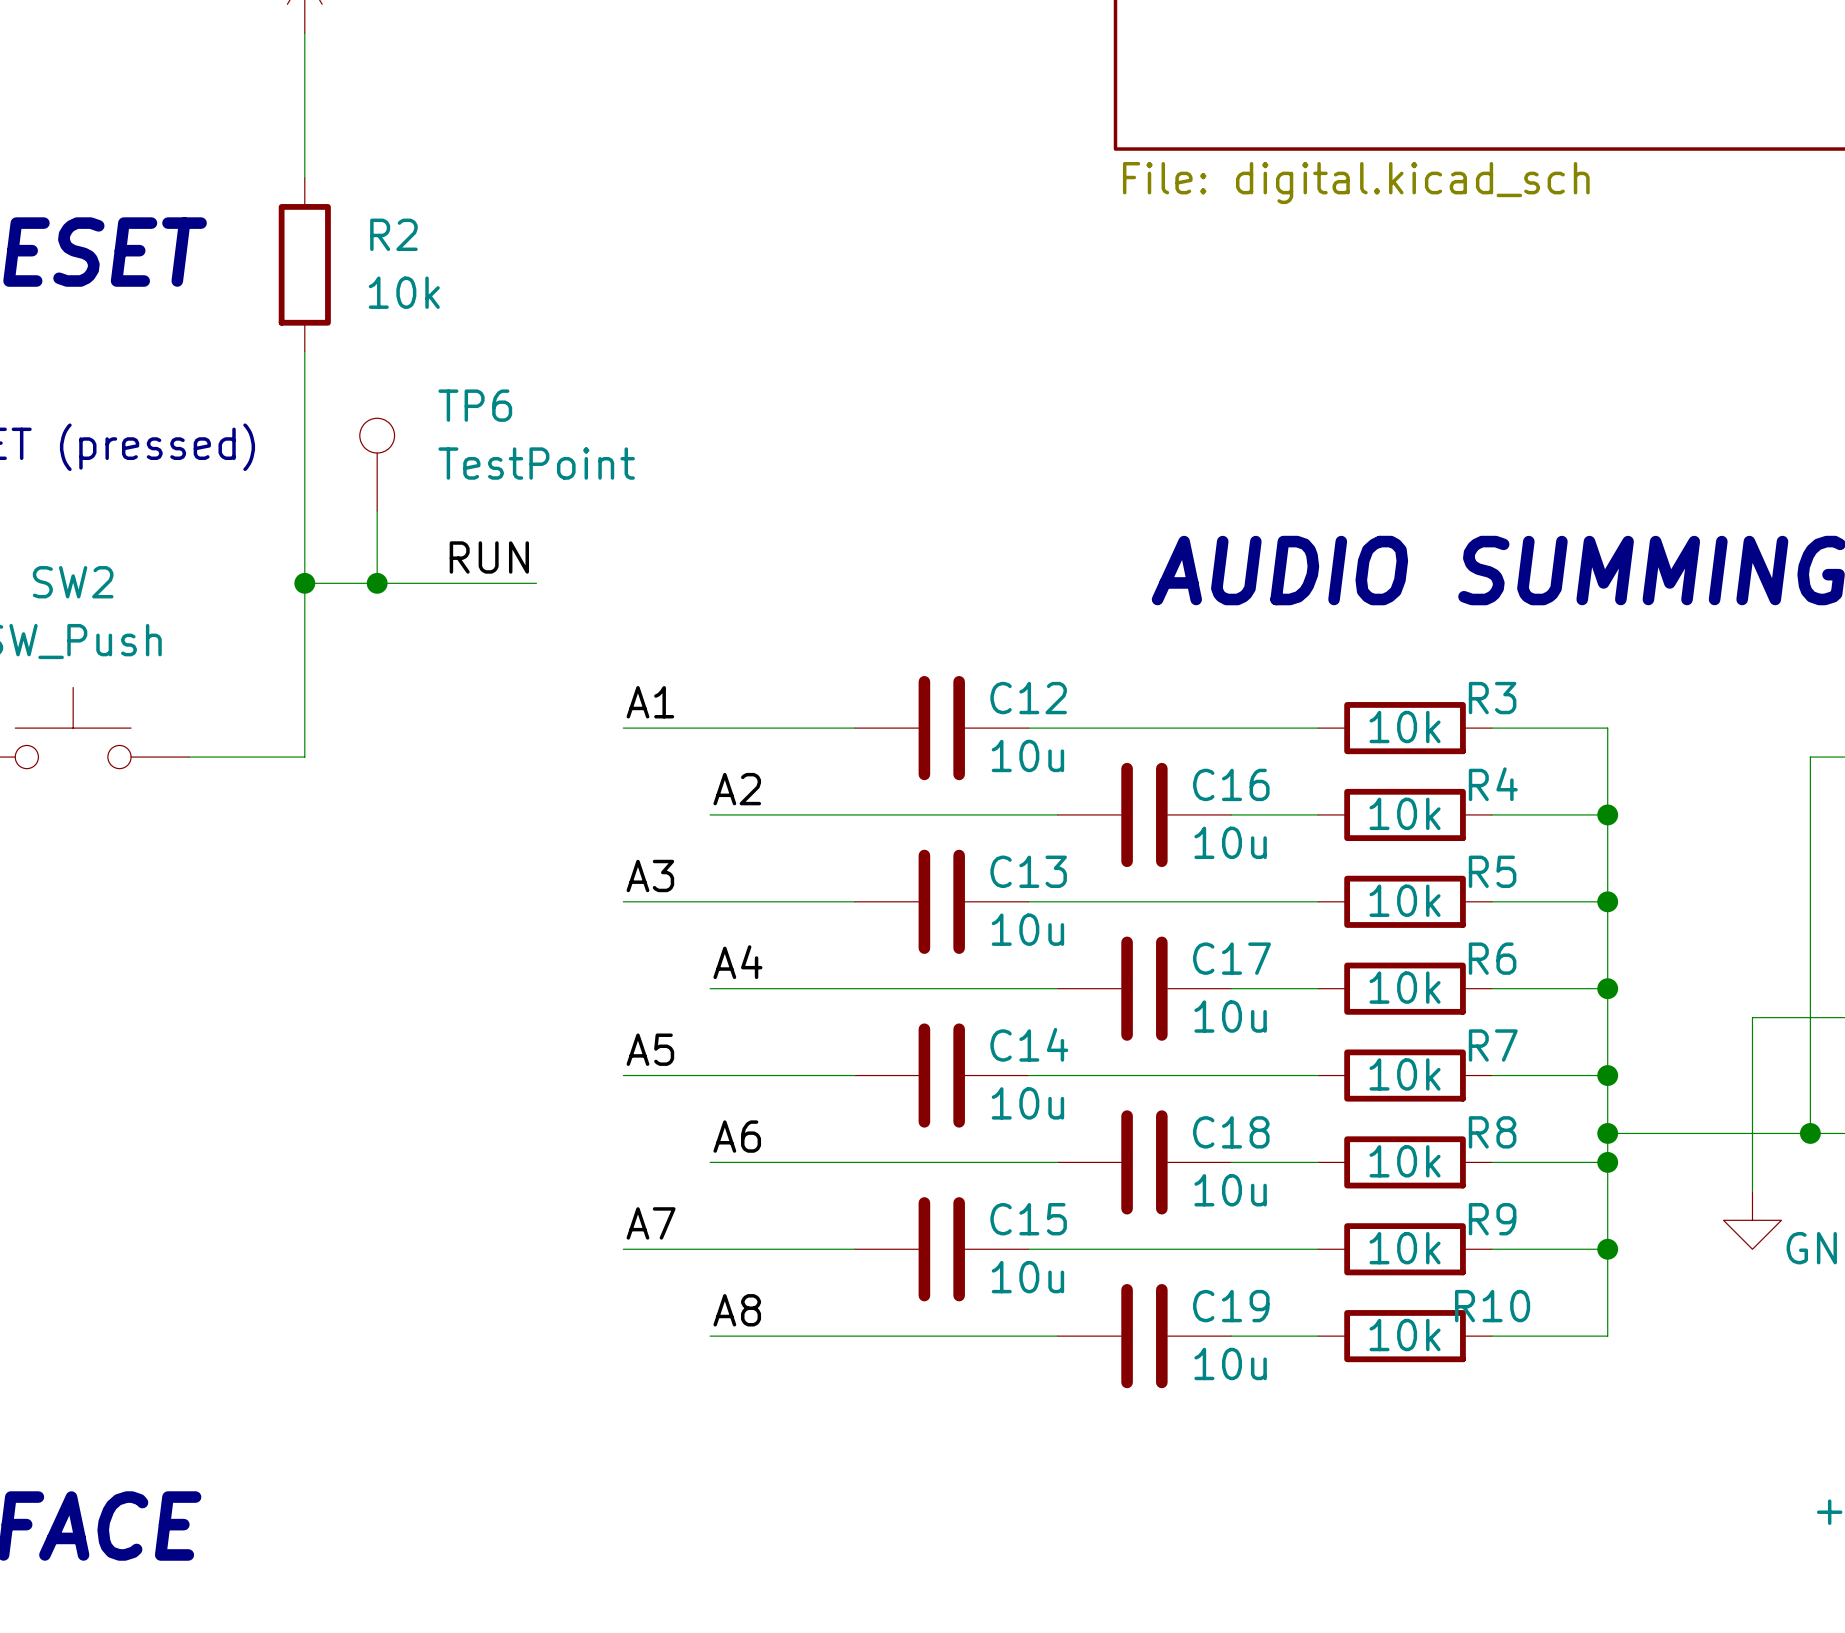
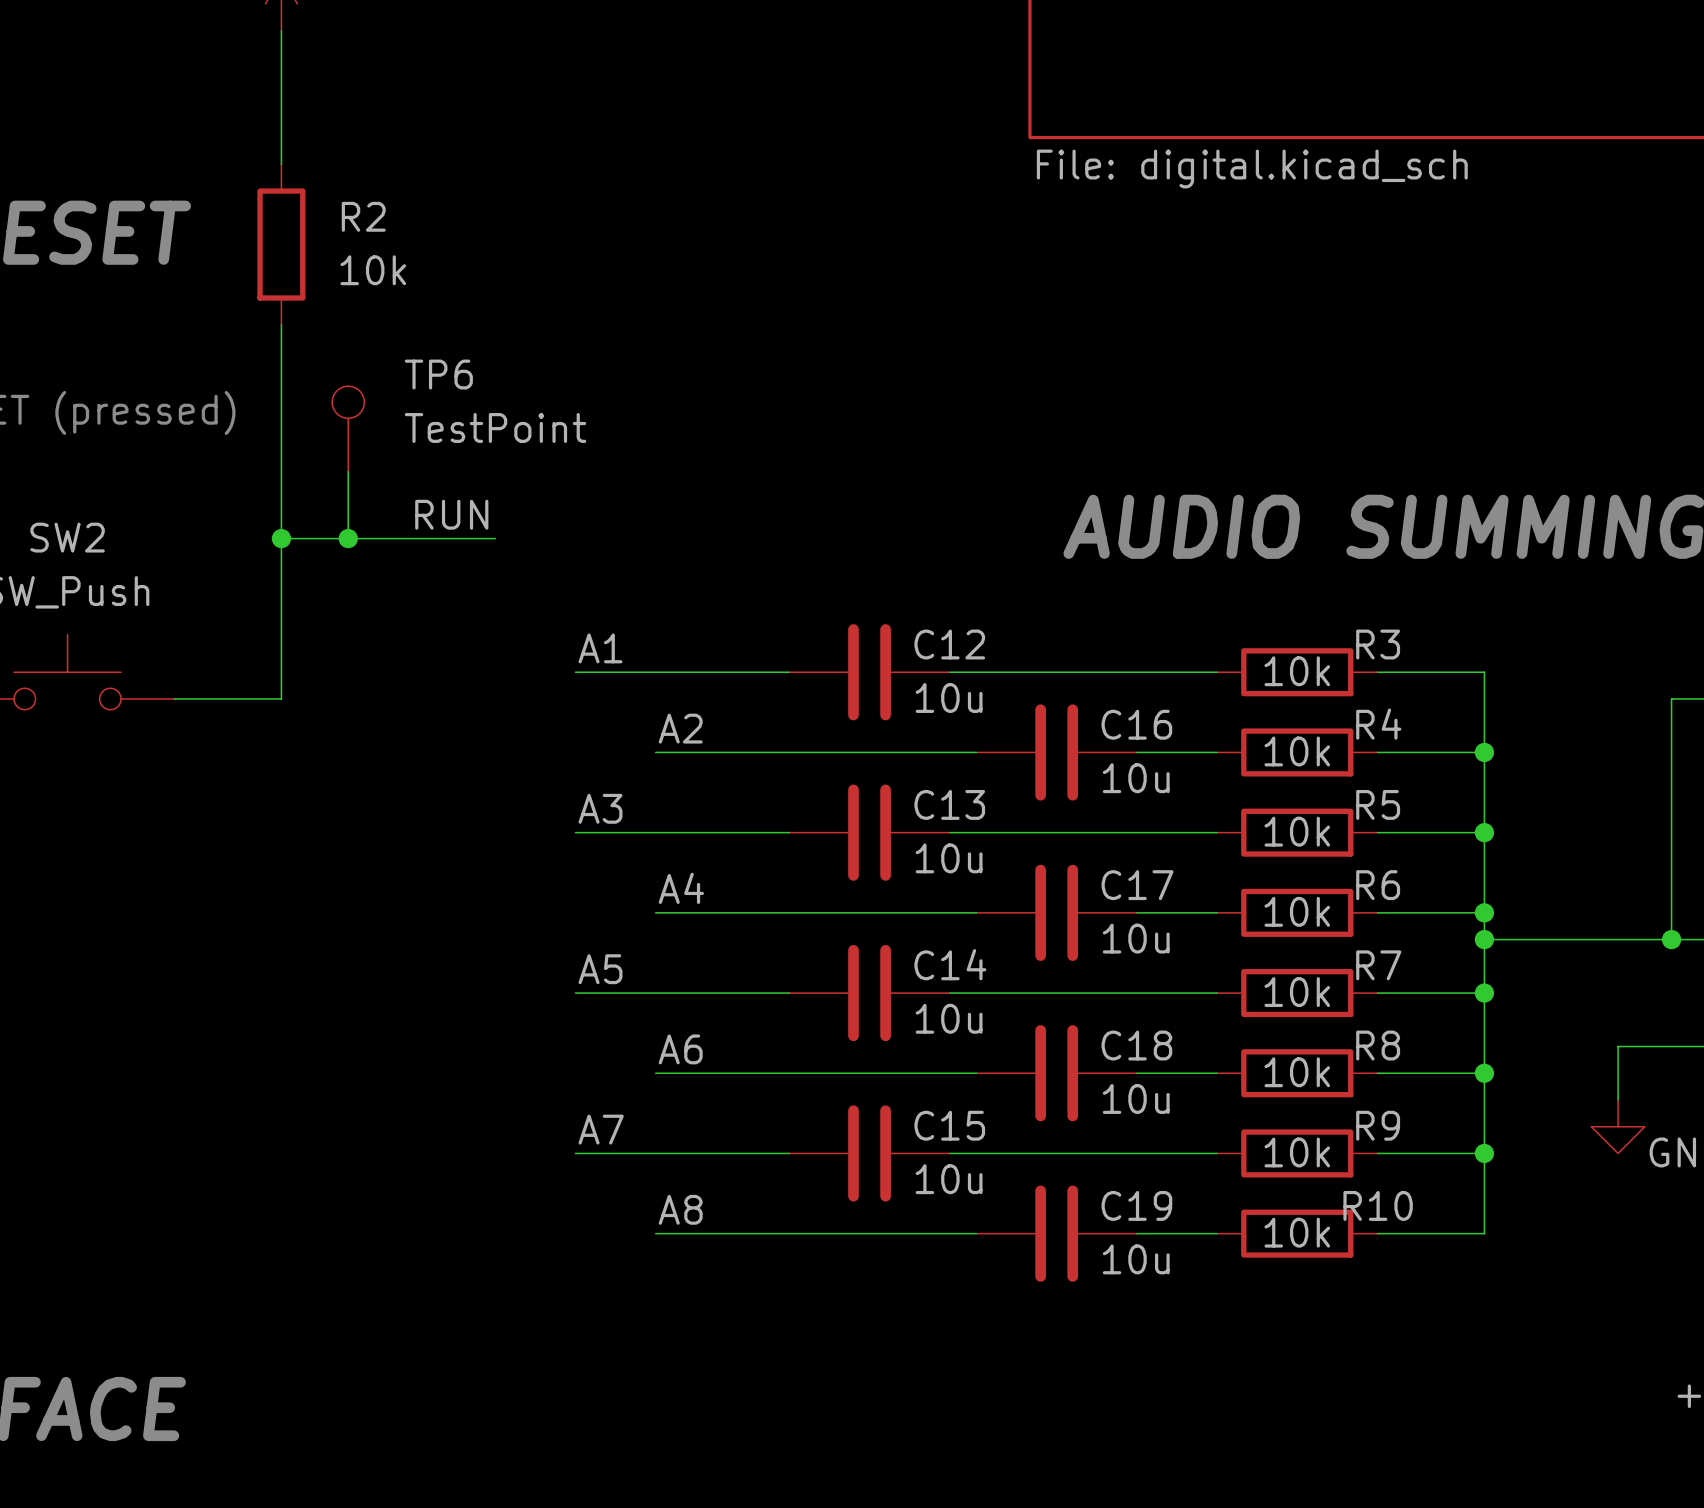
wire: (1752, 1017) (1752, 1133) (1607, 1133) -> (1618, 939) (1484, 939)
wire: (1810, 1017) (1810, 1133) -> none
junction position: (1607, 1133) -> (1484, 939)
junction position: (1810, 1133) -> (1671, 939)

